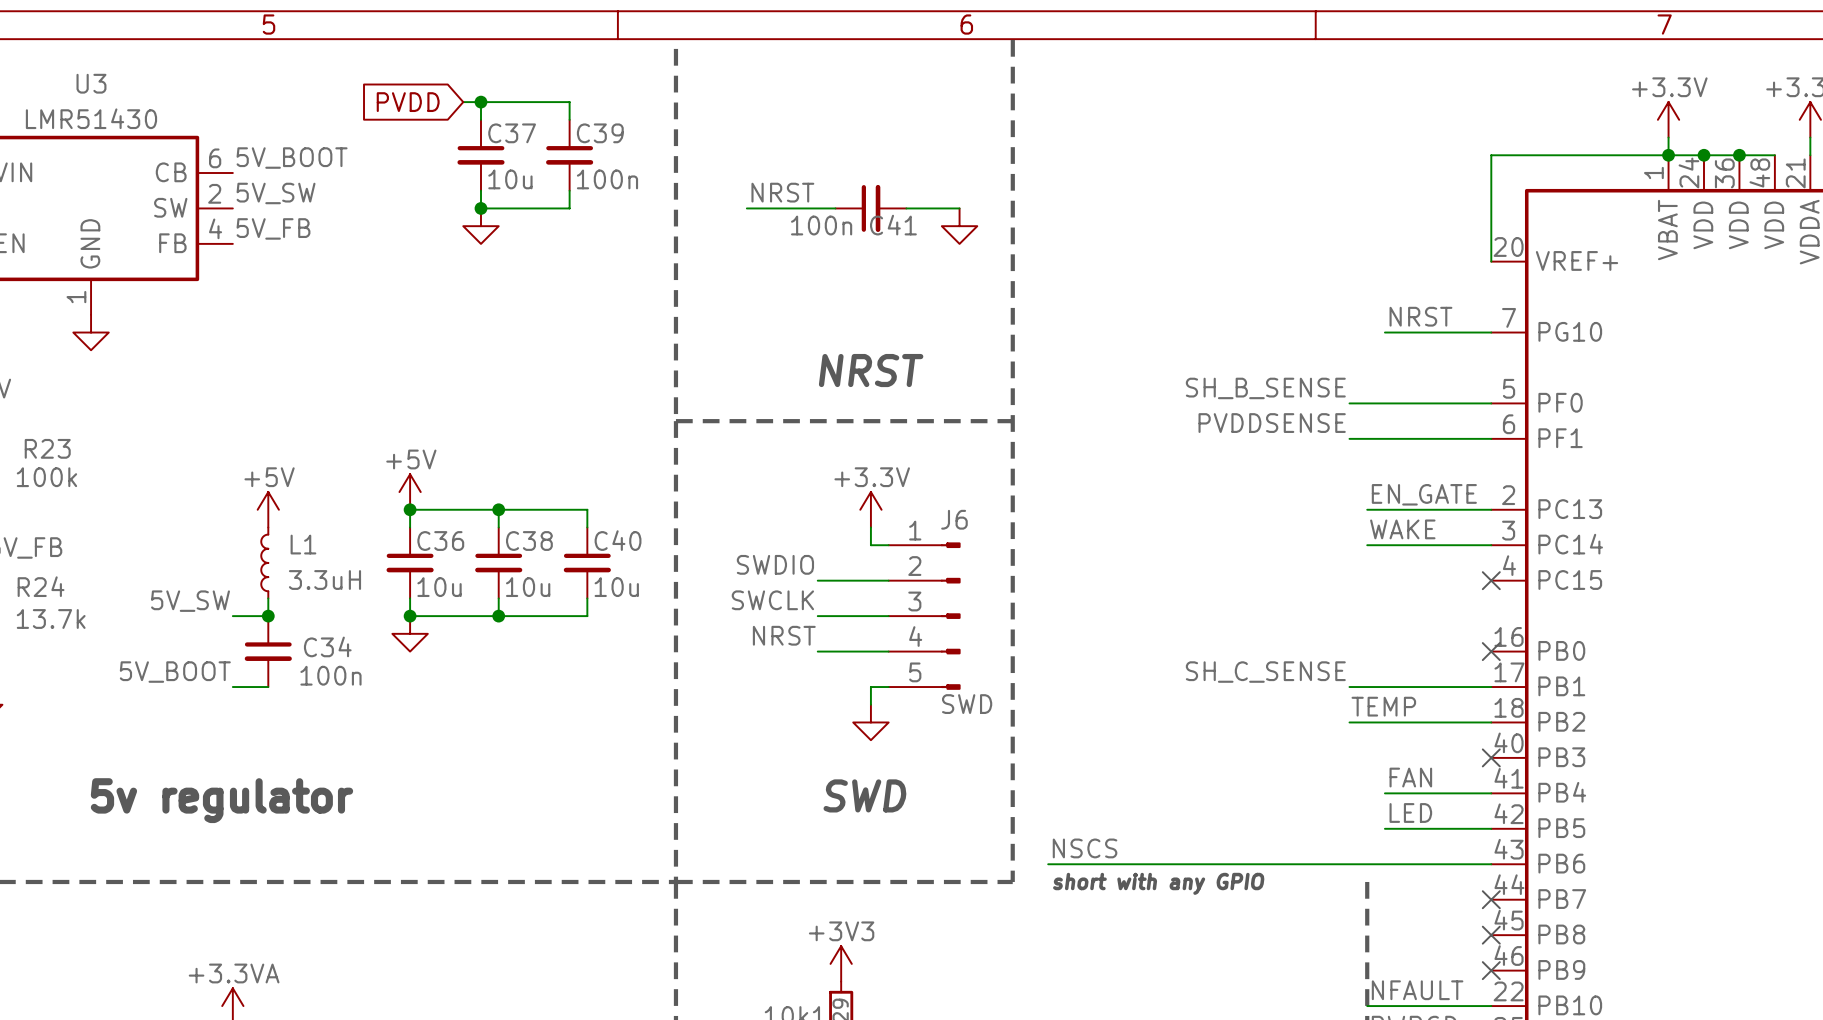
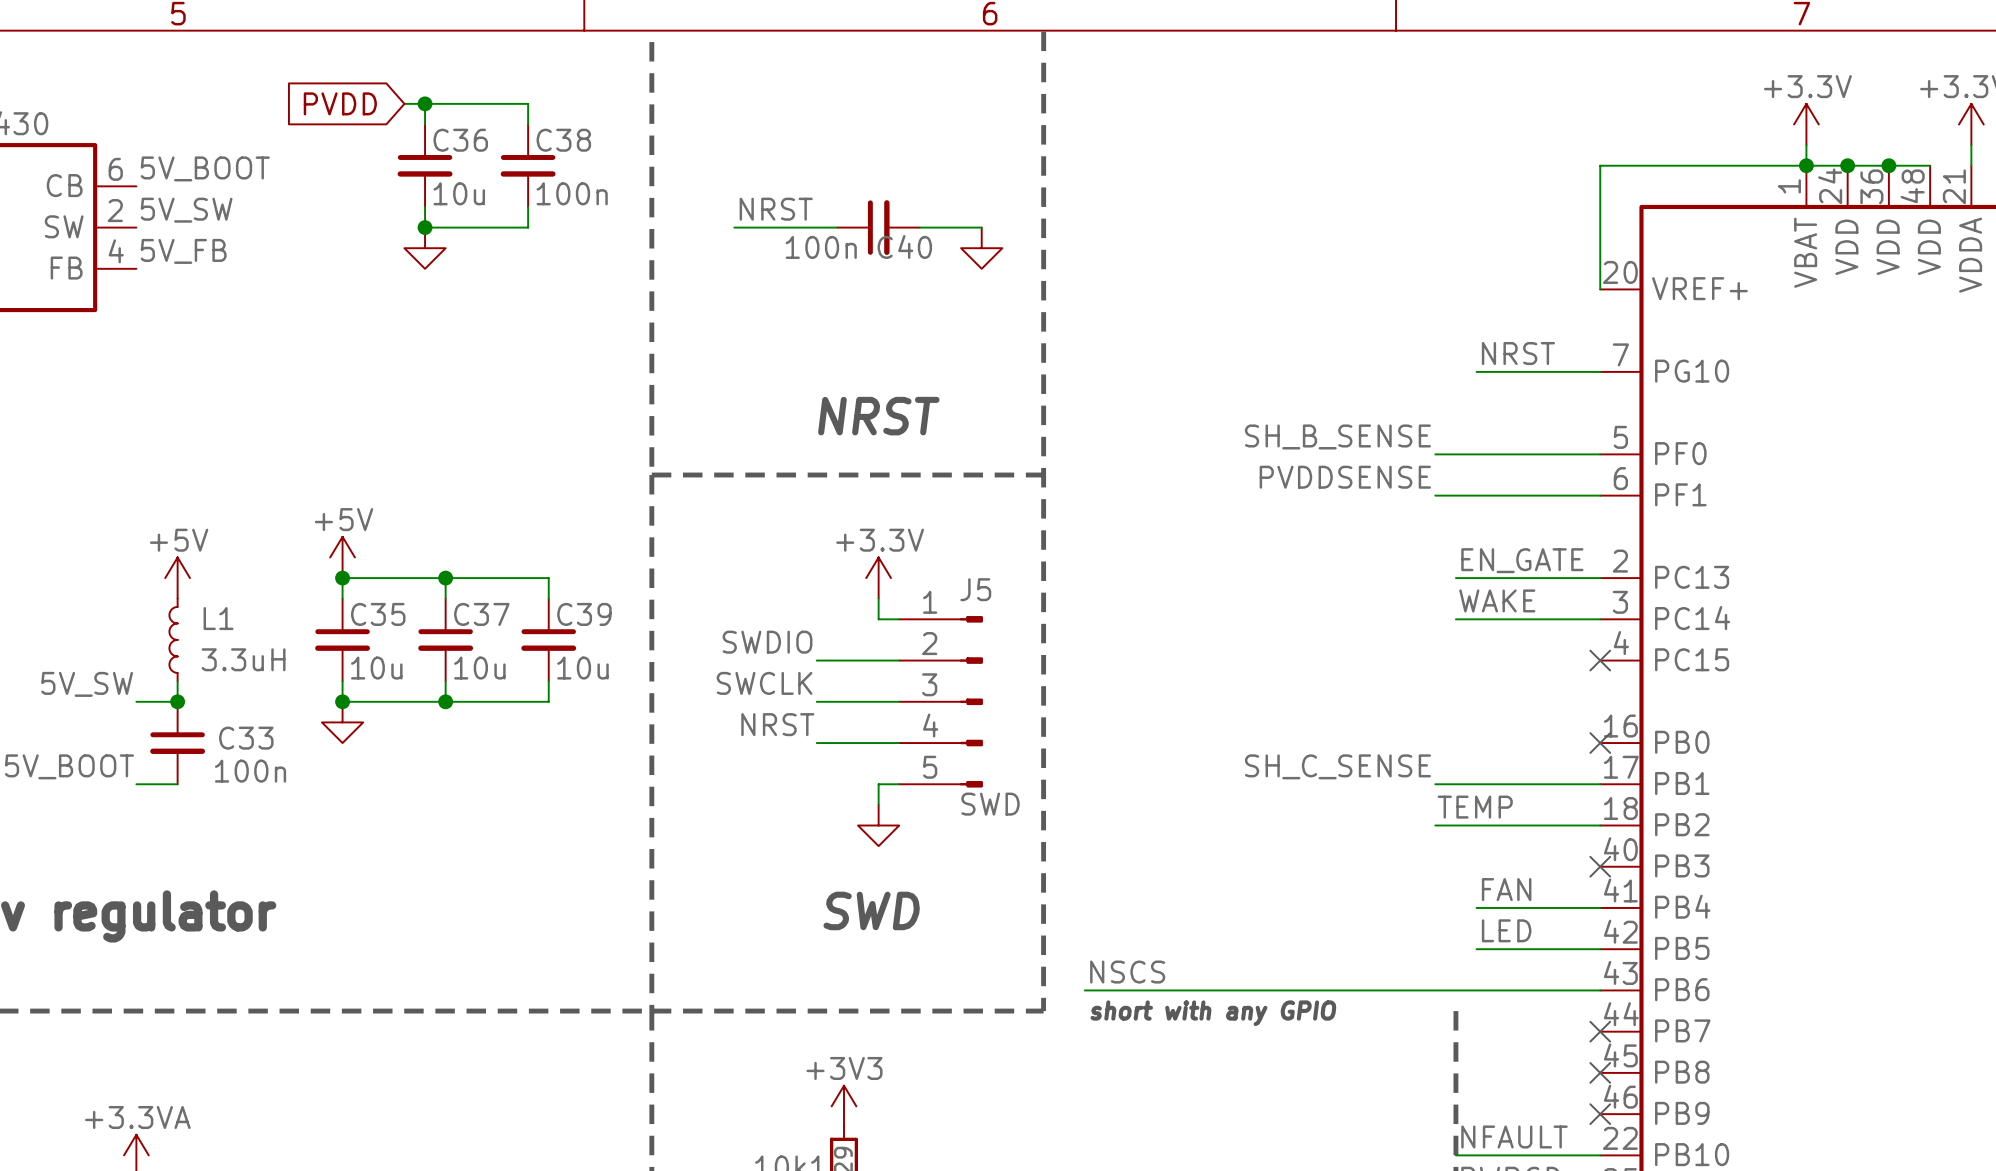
C37 name: C37 (512, 133) -> C36 (460, 140)
C39 name: C39 (600, 133) -> C38 (563, 140)
C41 name: C41 (893, 225) -> C40 (904, 246)
J6 name: J6 (954, 519) -> J5 (975, 589)
C40 name: C40 (618, 540) -> C39 (584, 614)
C36 name: C36 (440, 541) -> C35 (378, 614)
C38 name: C38 (529, 541) -> C37 (481, 614)
C34 name: C34 (327, 646) -> C33 (246, 738)

